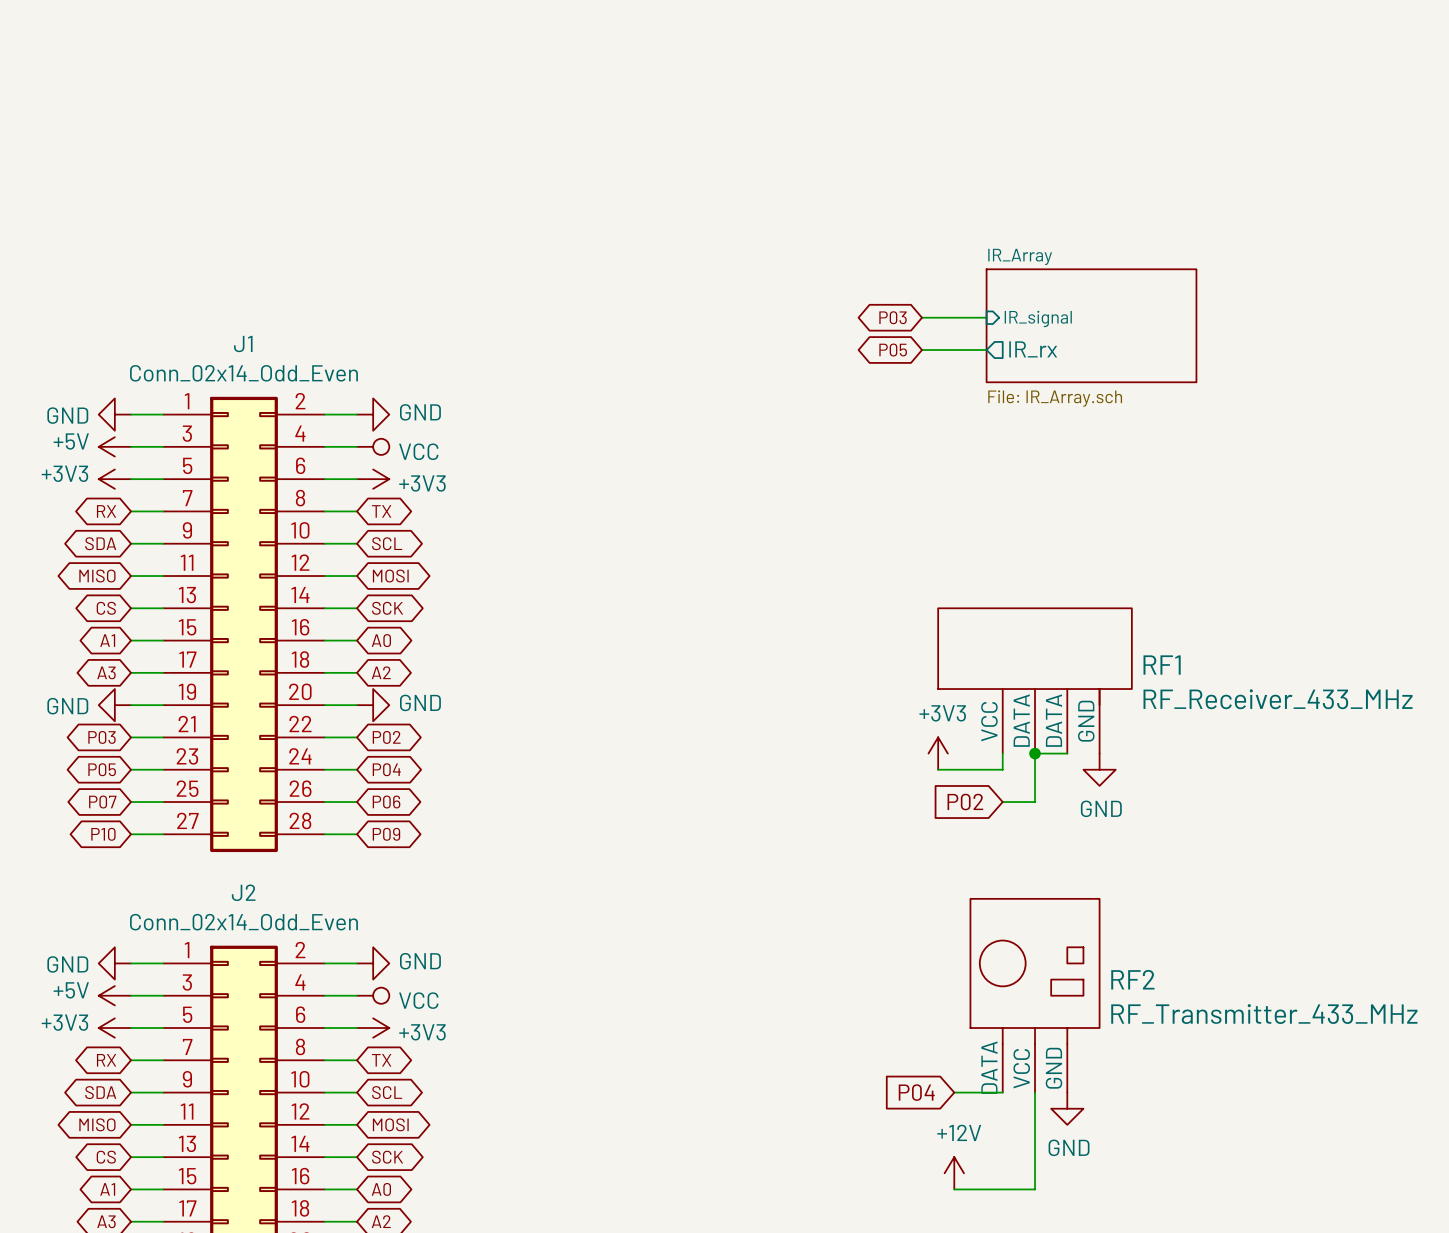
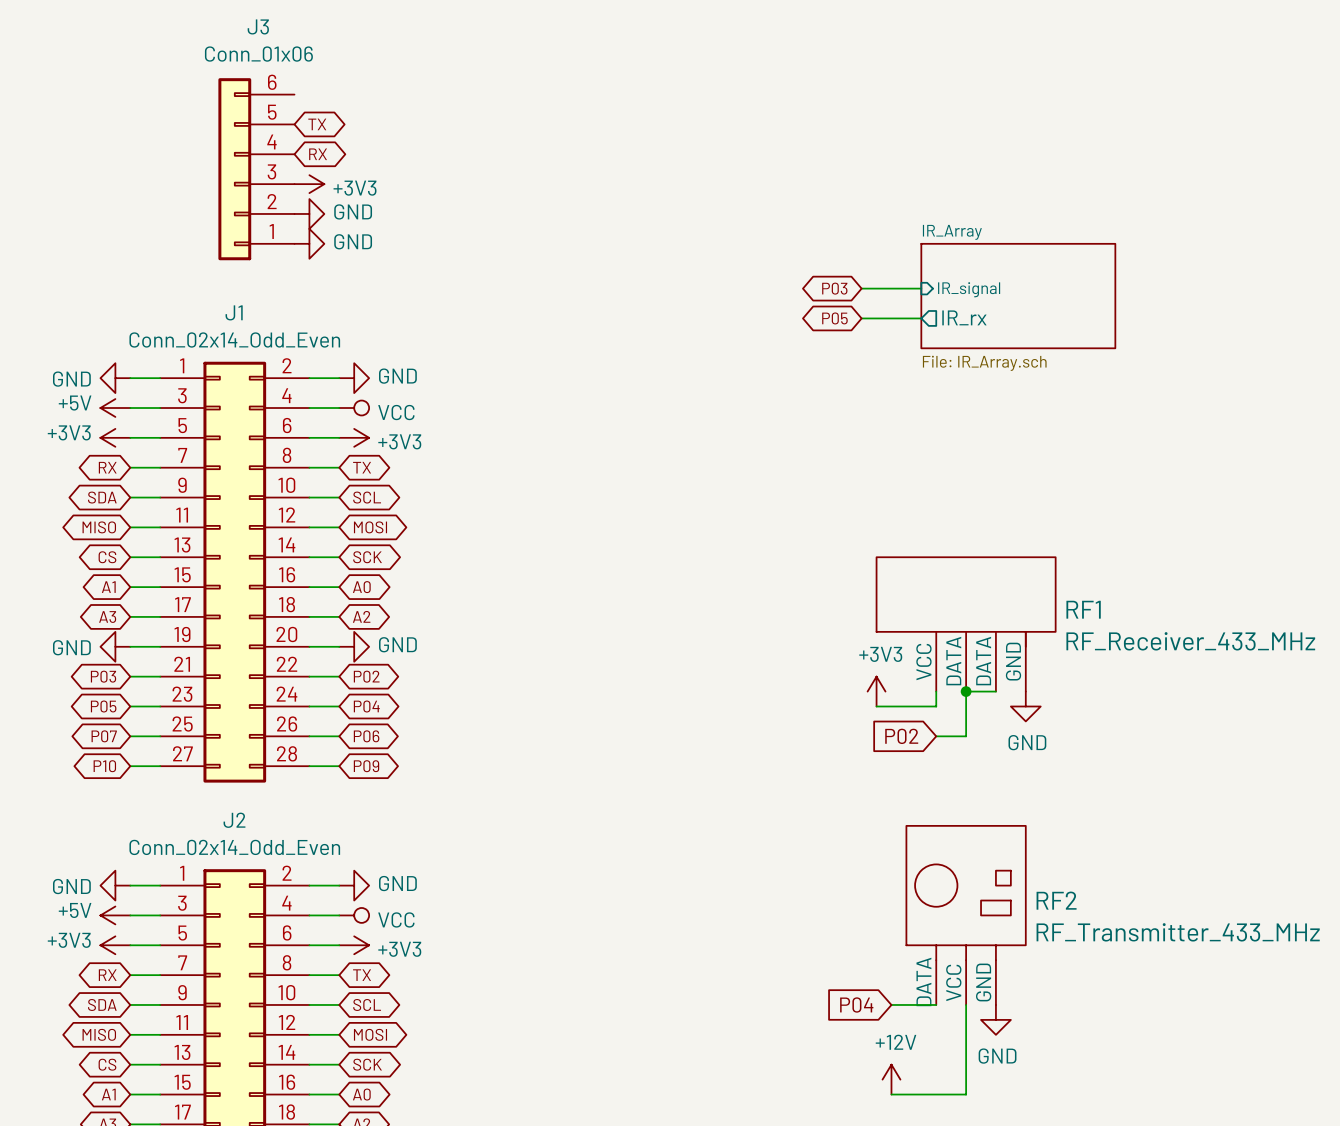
global label: none -> TX (317, 124)
global label: none -> RX (318, 154)
J3: none -> Conn_01x06 (256, 169)
power symbol: none -> +3V3 (309, 184)
power symbol: none -> GND (309, 213)
power symbol: none -> GND (309, 243)

